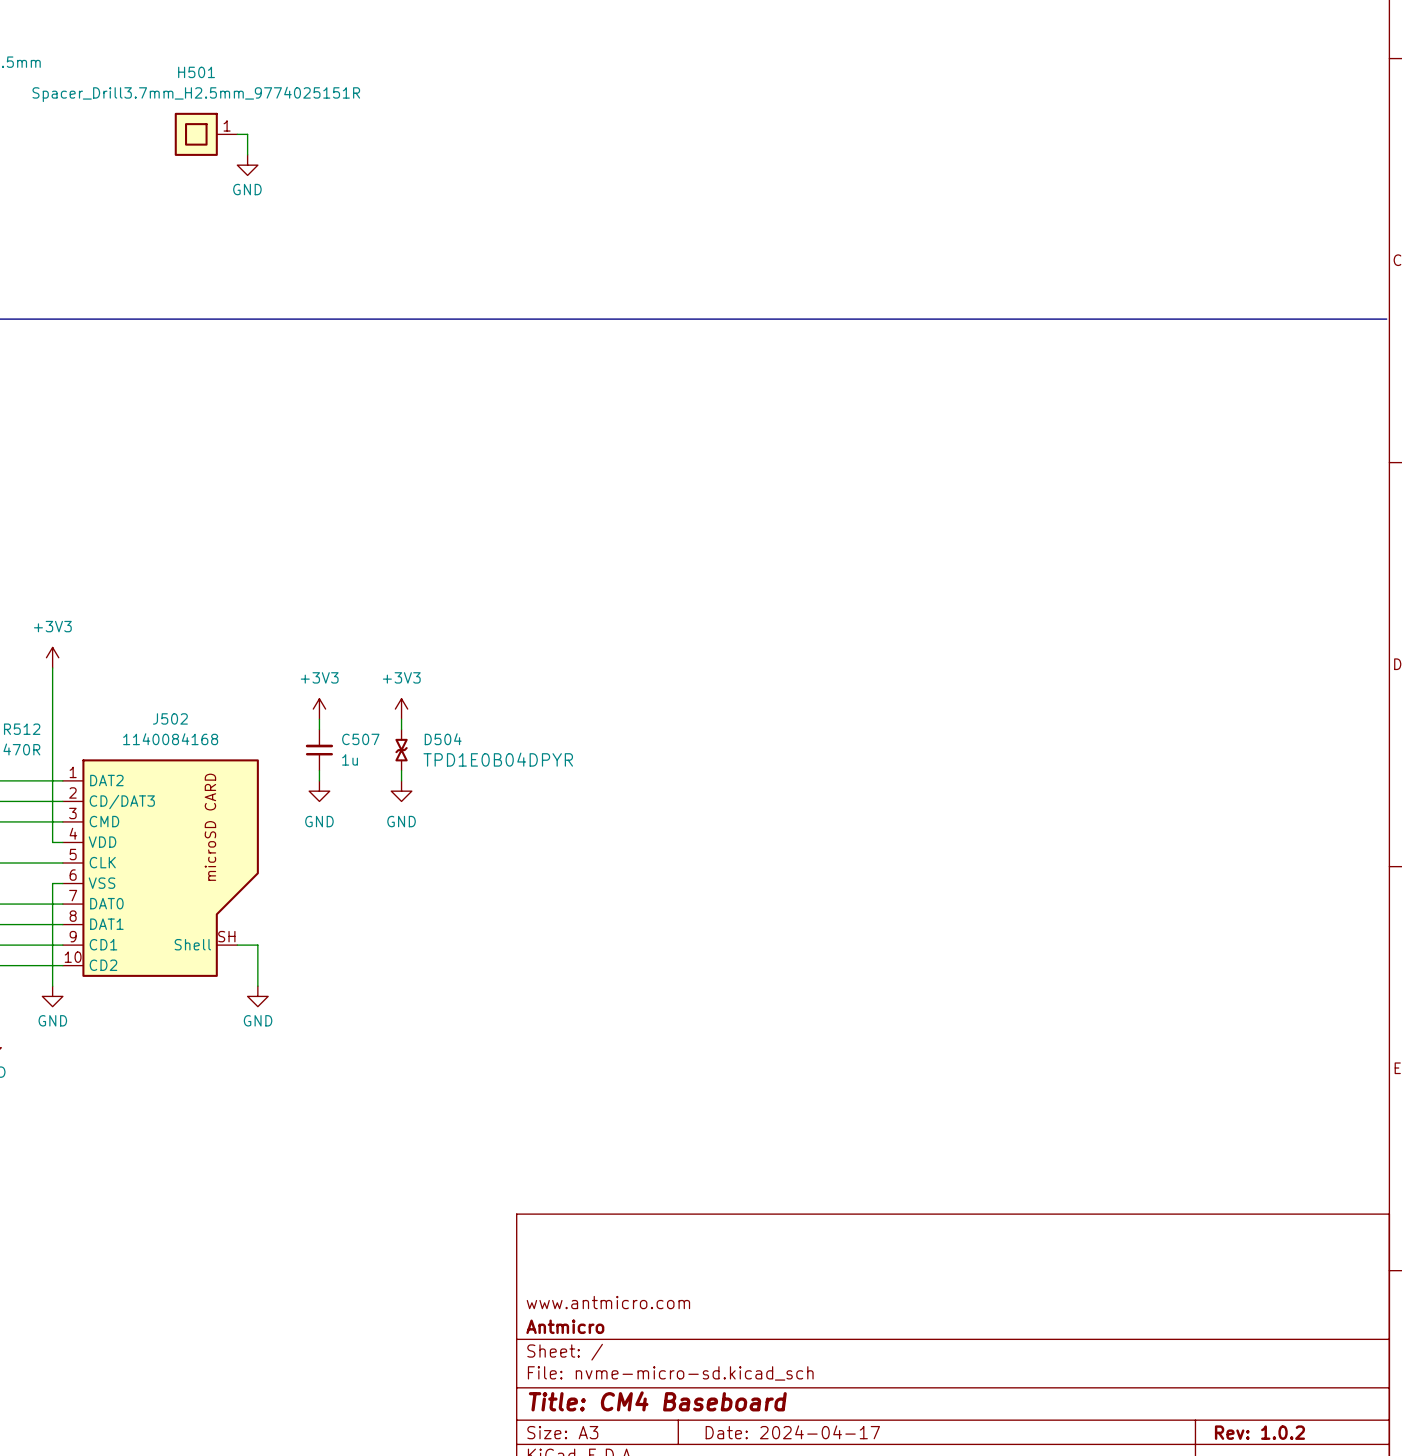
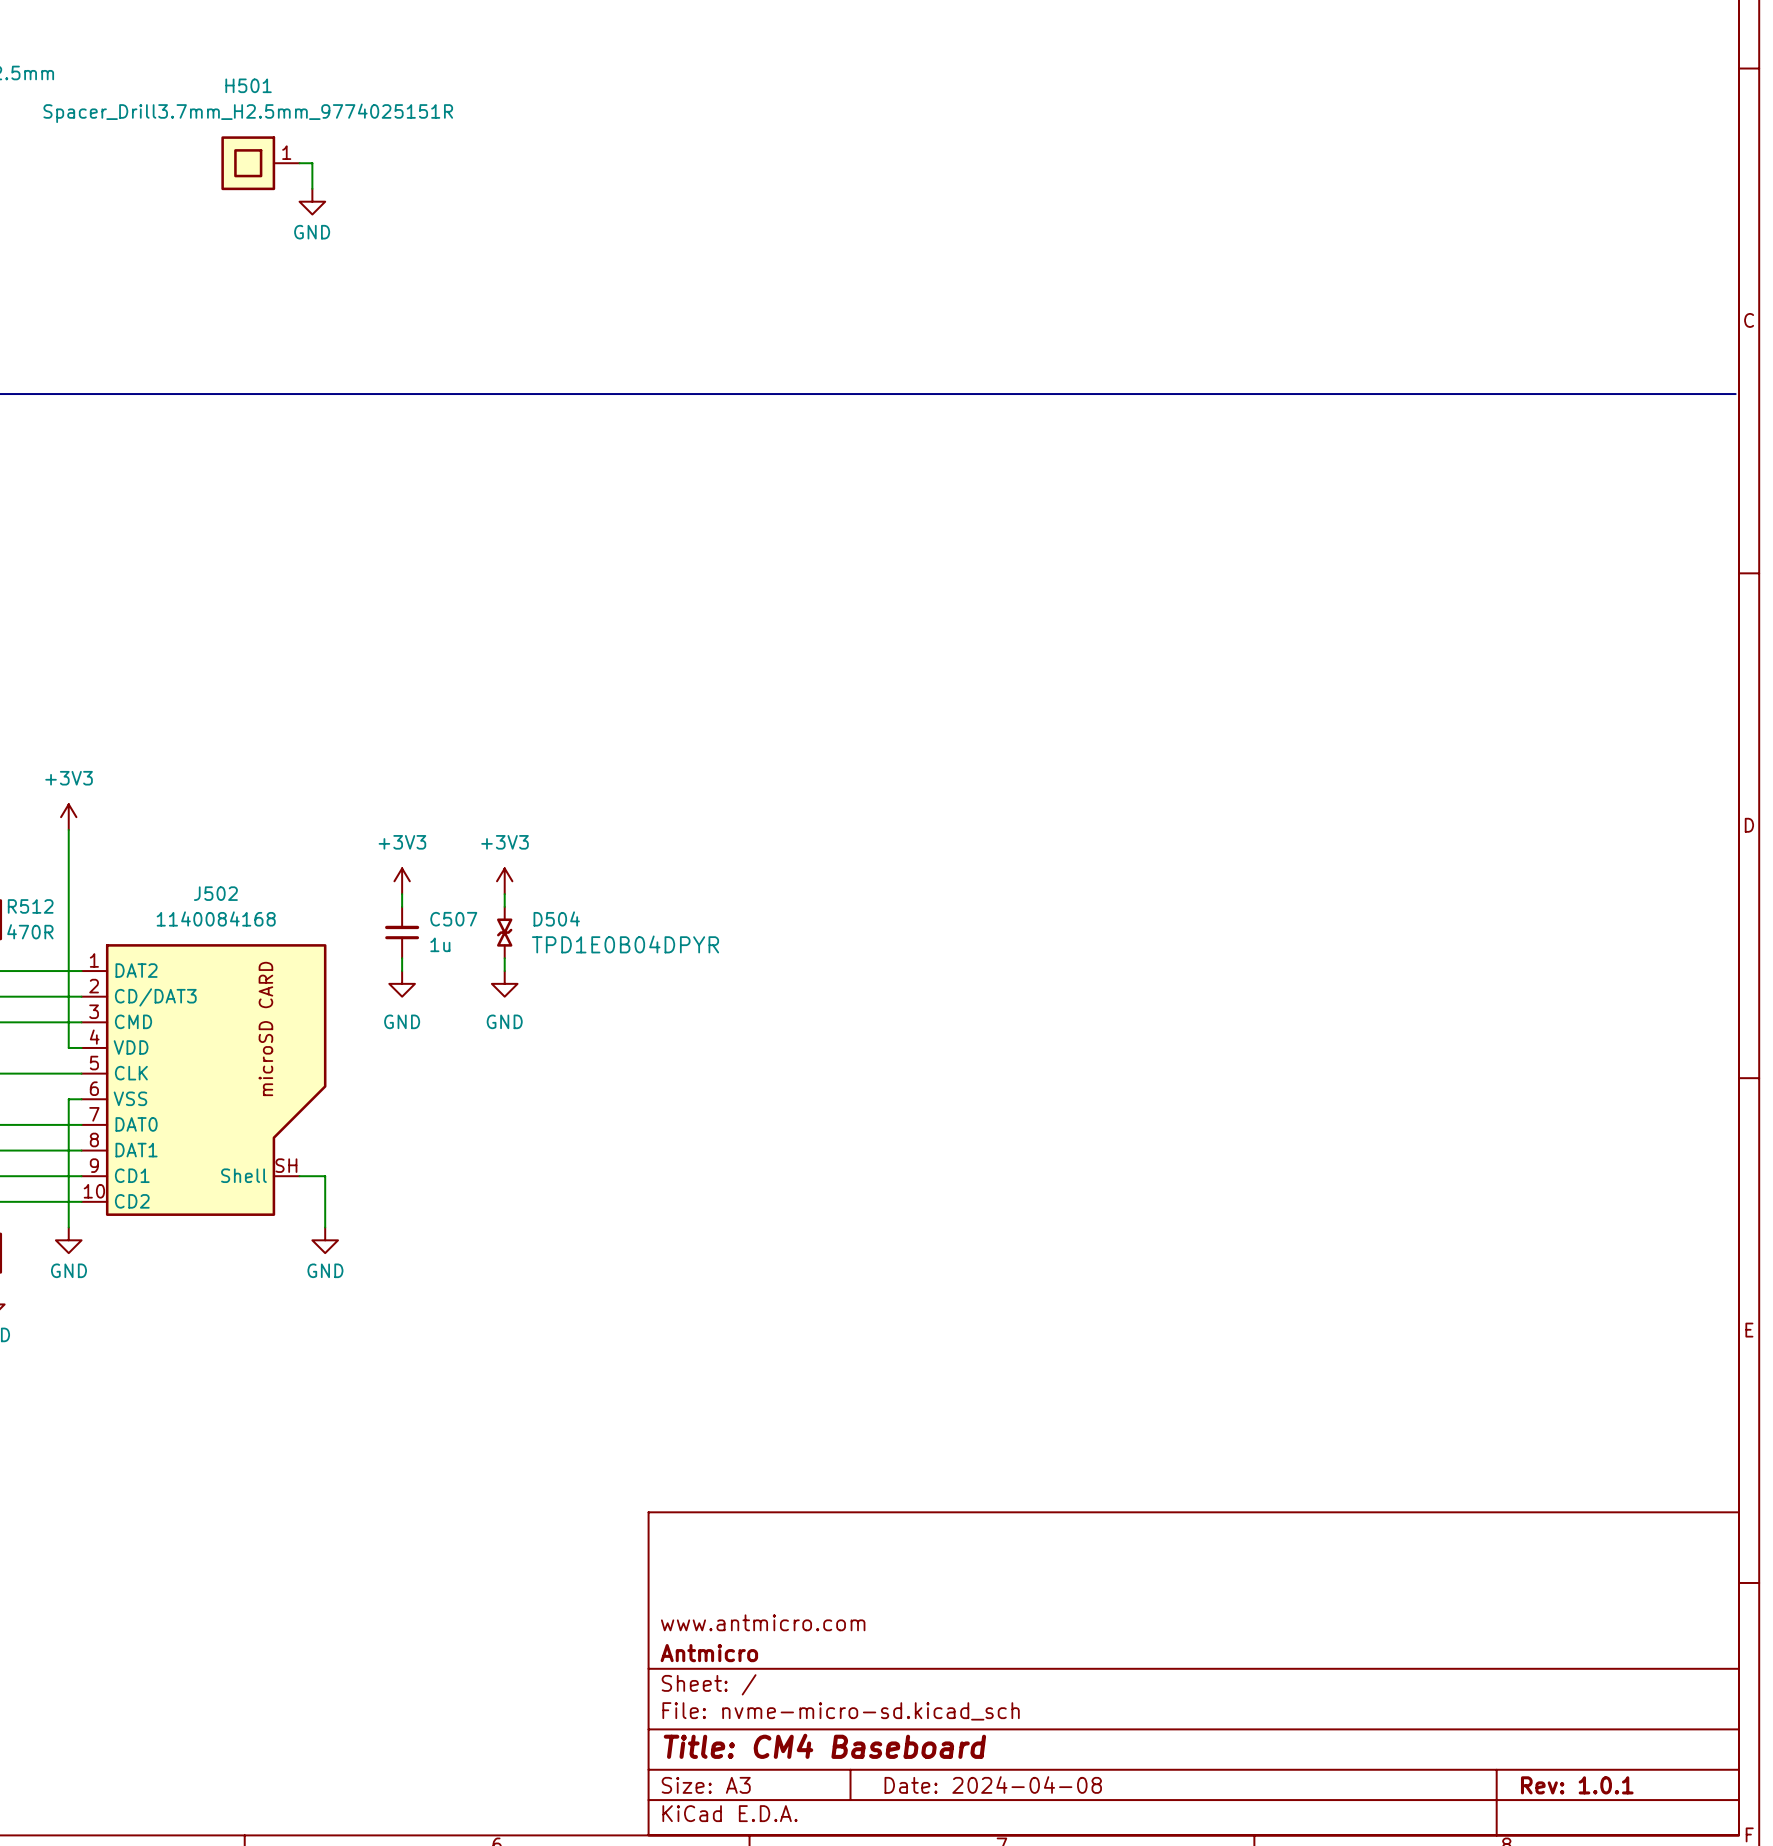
title block: Date: 2024-04-17 (792, 1432) -> Date: 2024-04-08 (993, 1785)
title block: Rev: 1.0.2 (1259, 1432) -> Rev: 1.0.1 (1577, 1785)

